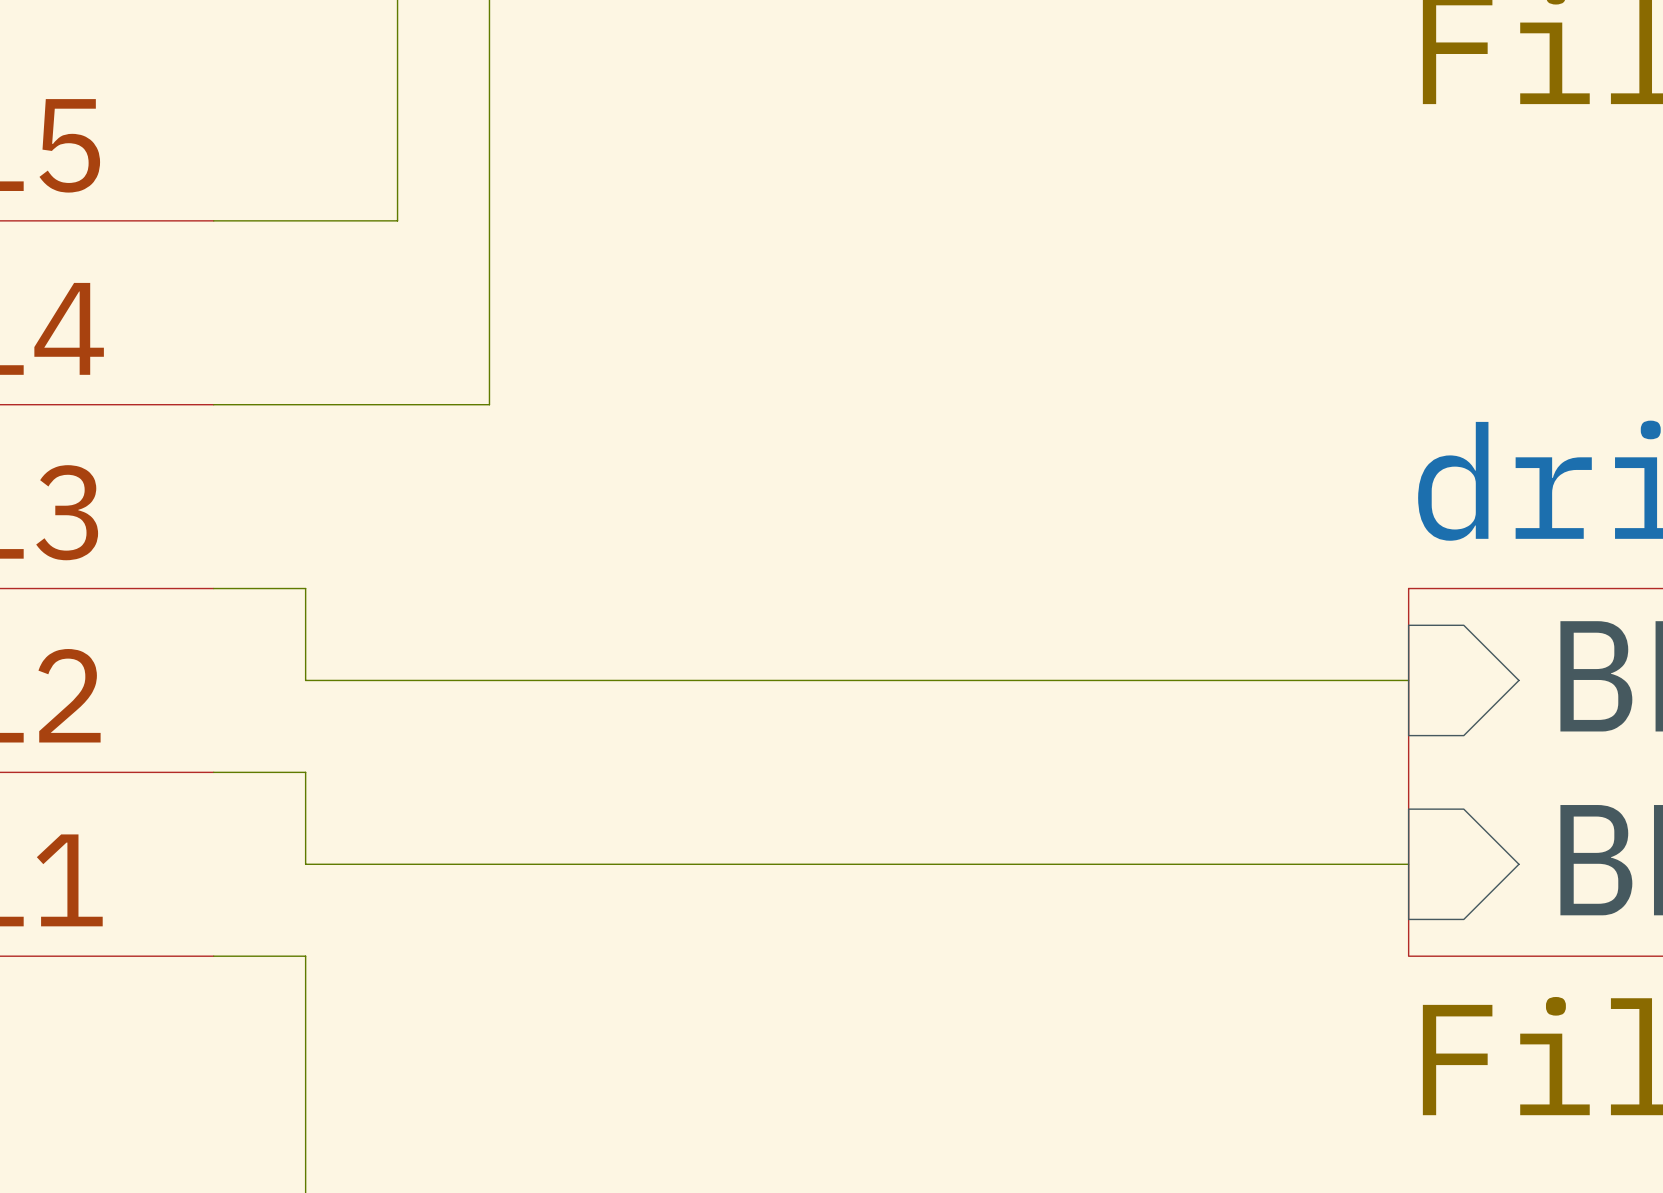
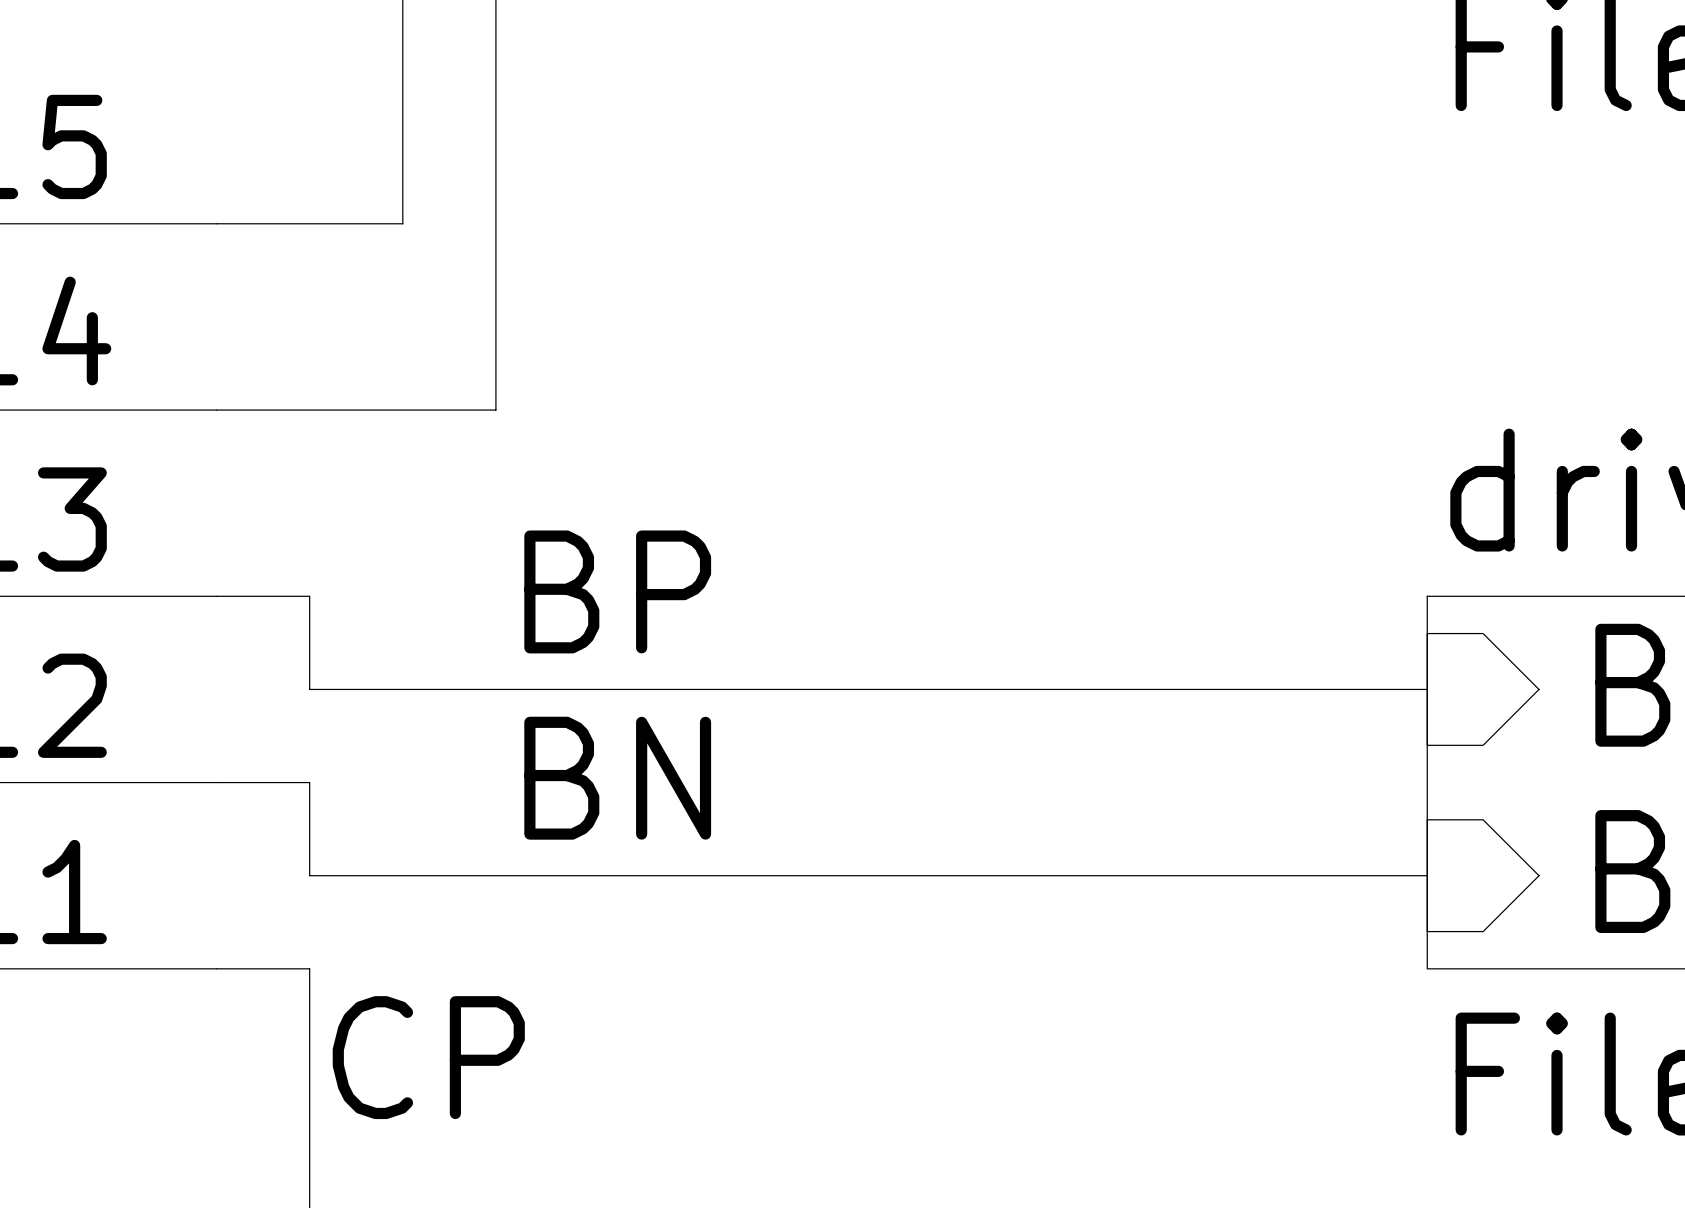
label: none -> BP (617, 591)
label: none -> BN (617, 778)
label: none -> CP (428, 1057)

